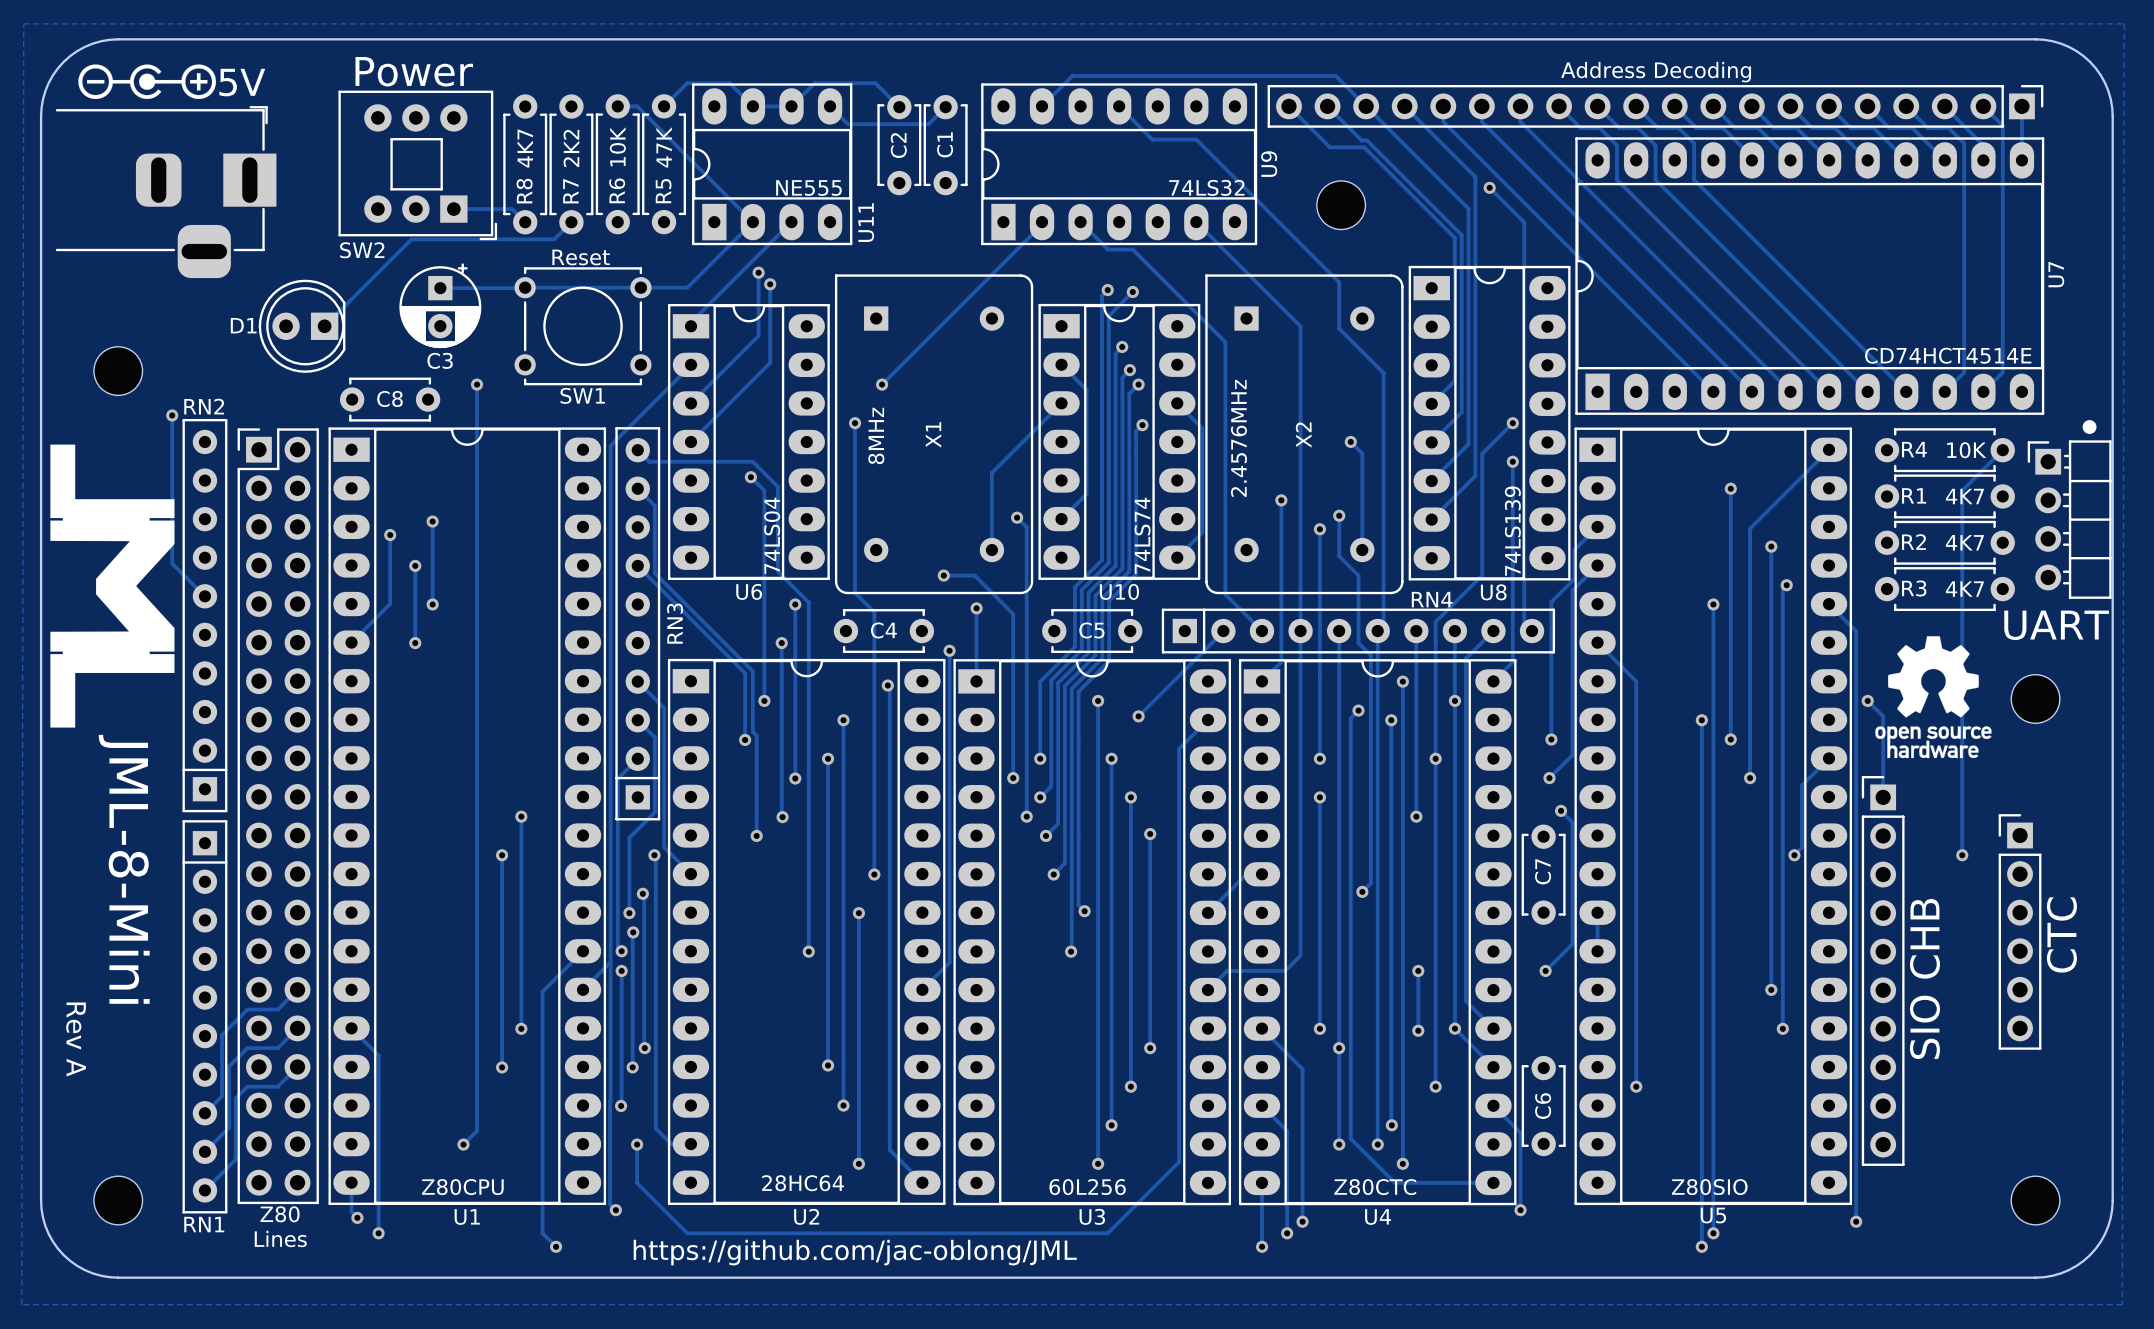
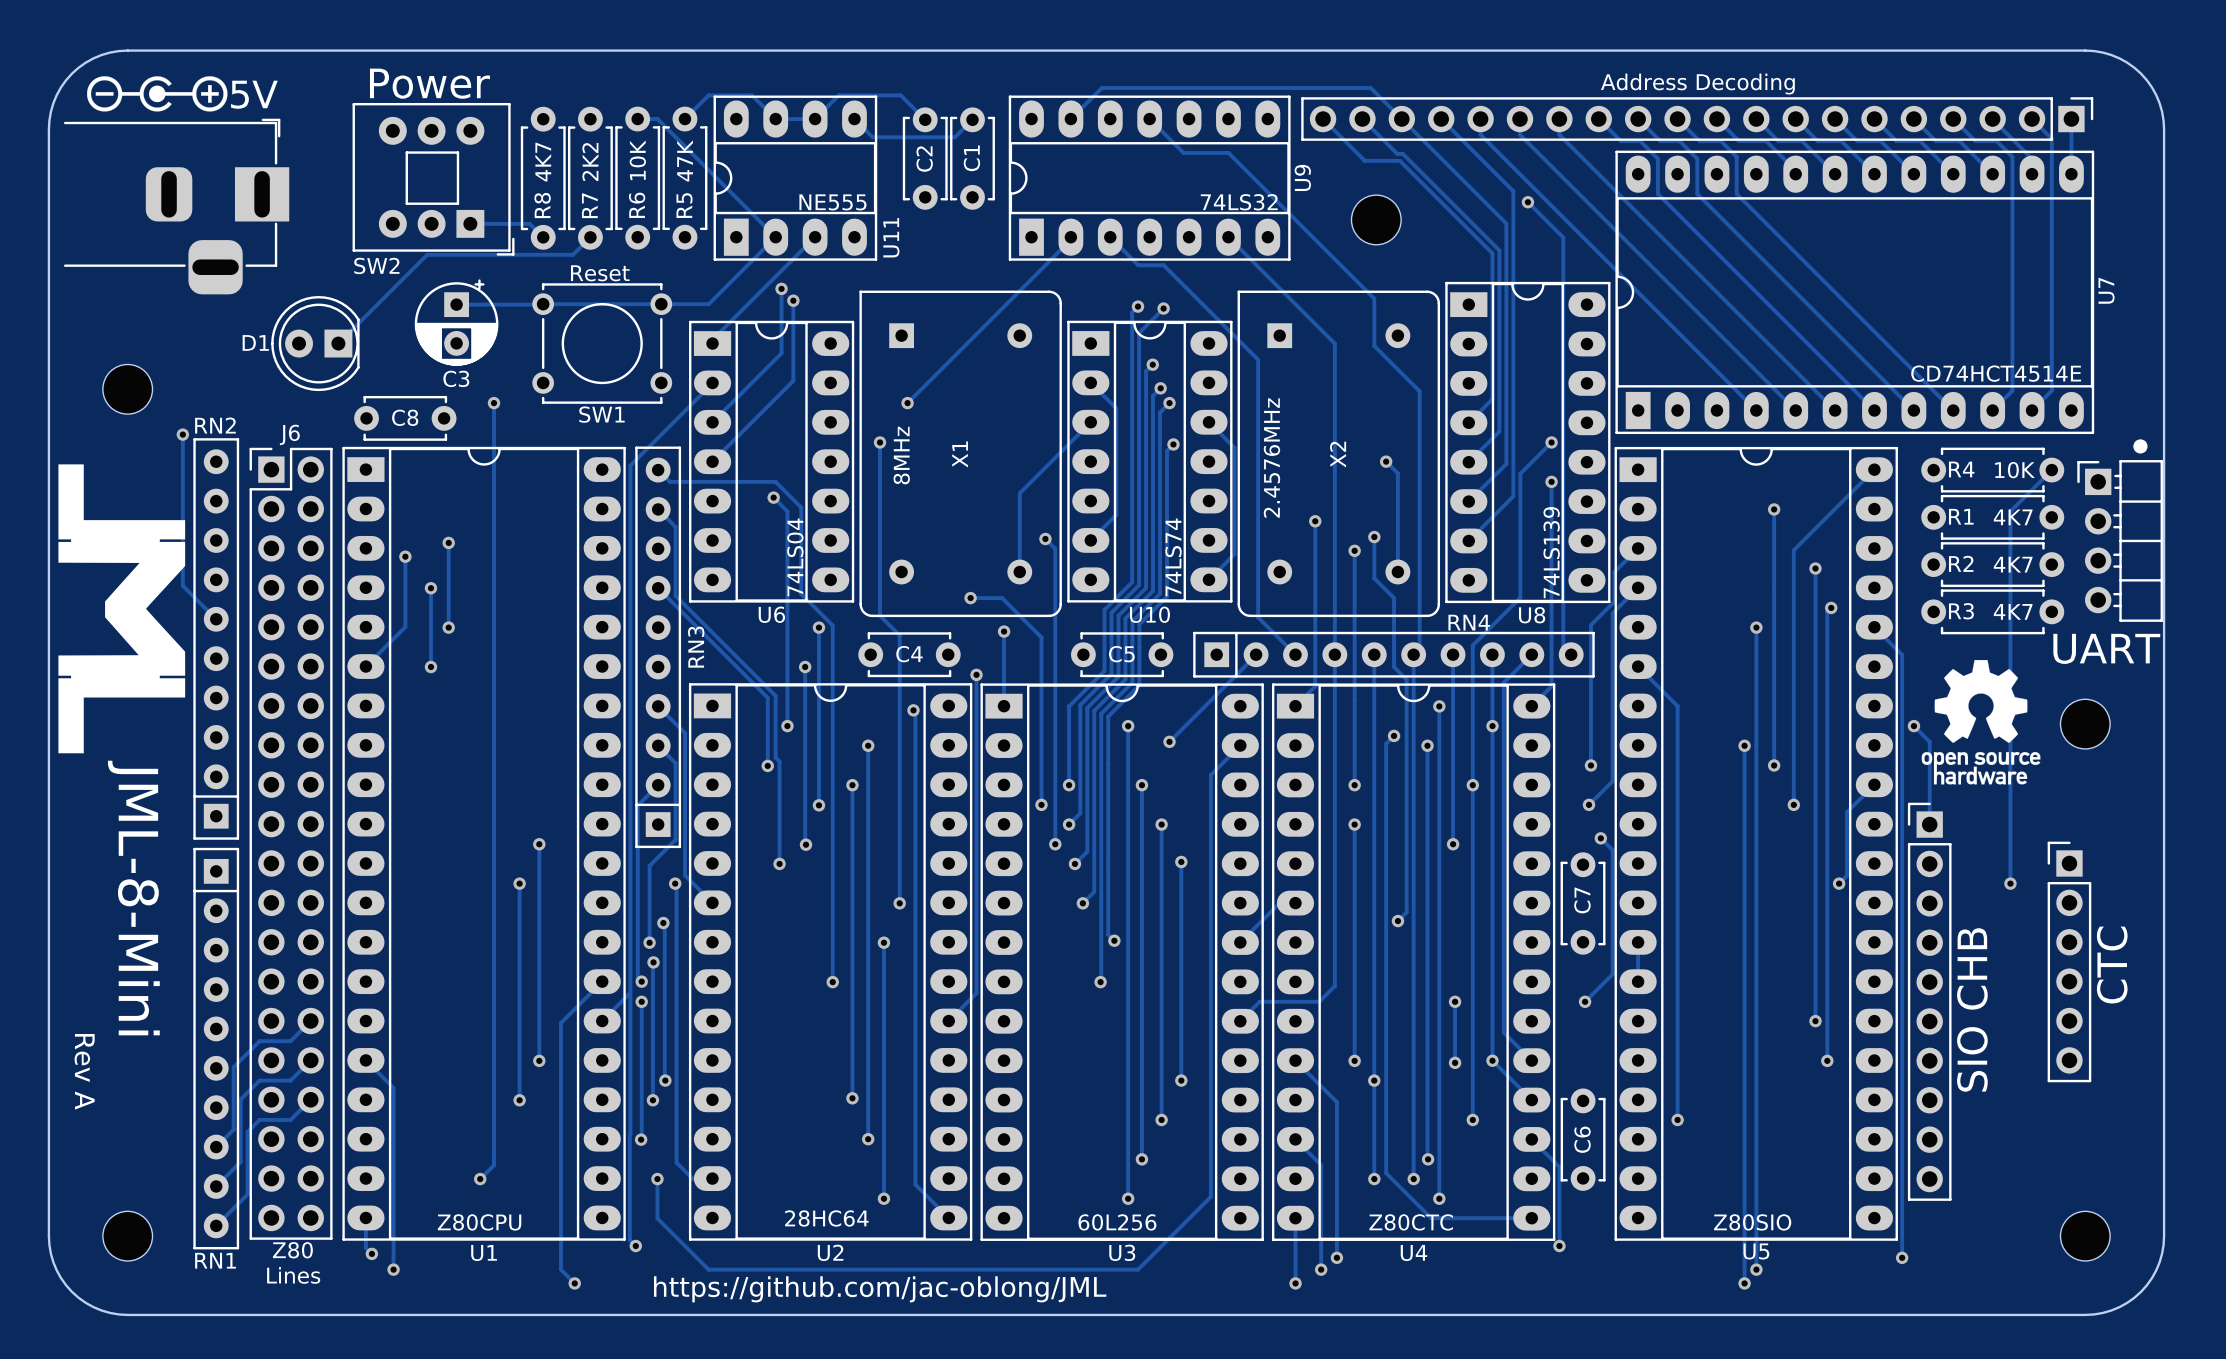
zone outline: (23, 23) (2124, 23) (2122, 1304) (21, 1304) (23, 23) -> none
J6 name: none -> J6 (289, 434)

